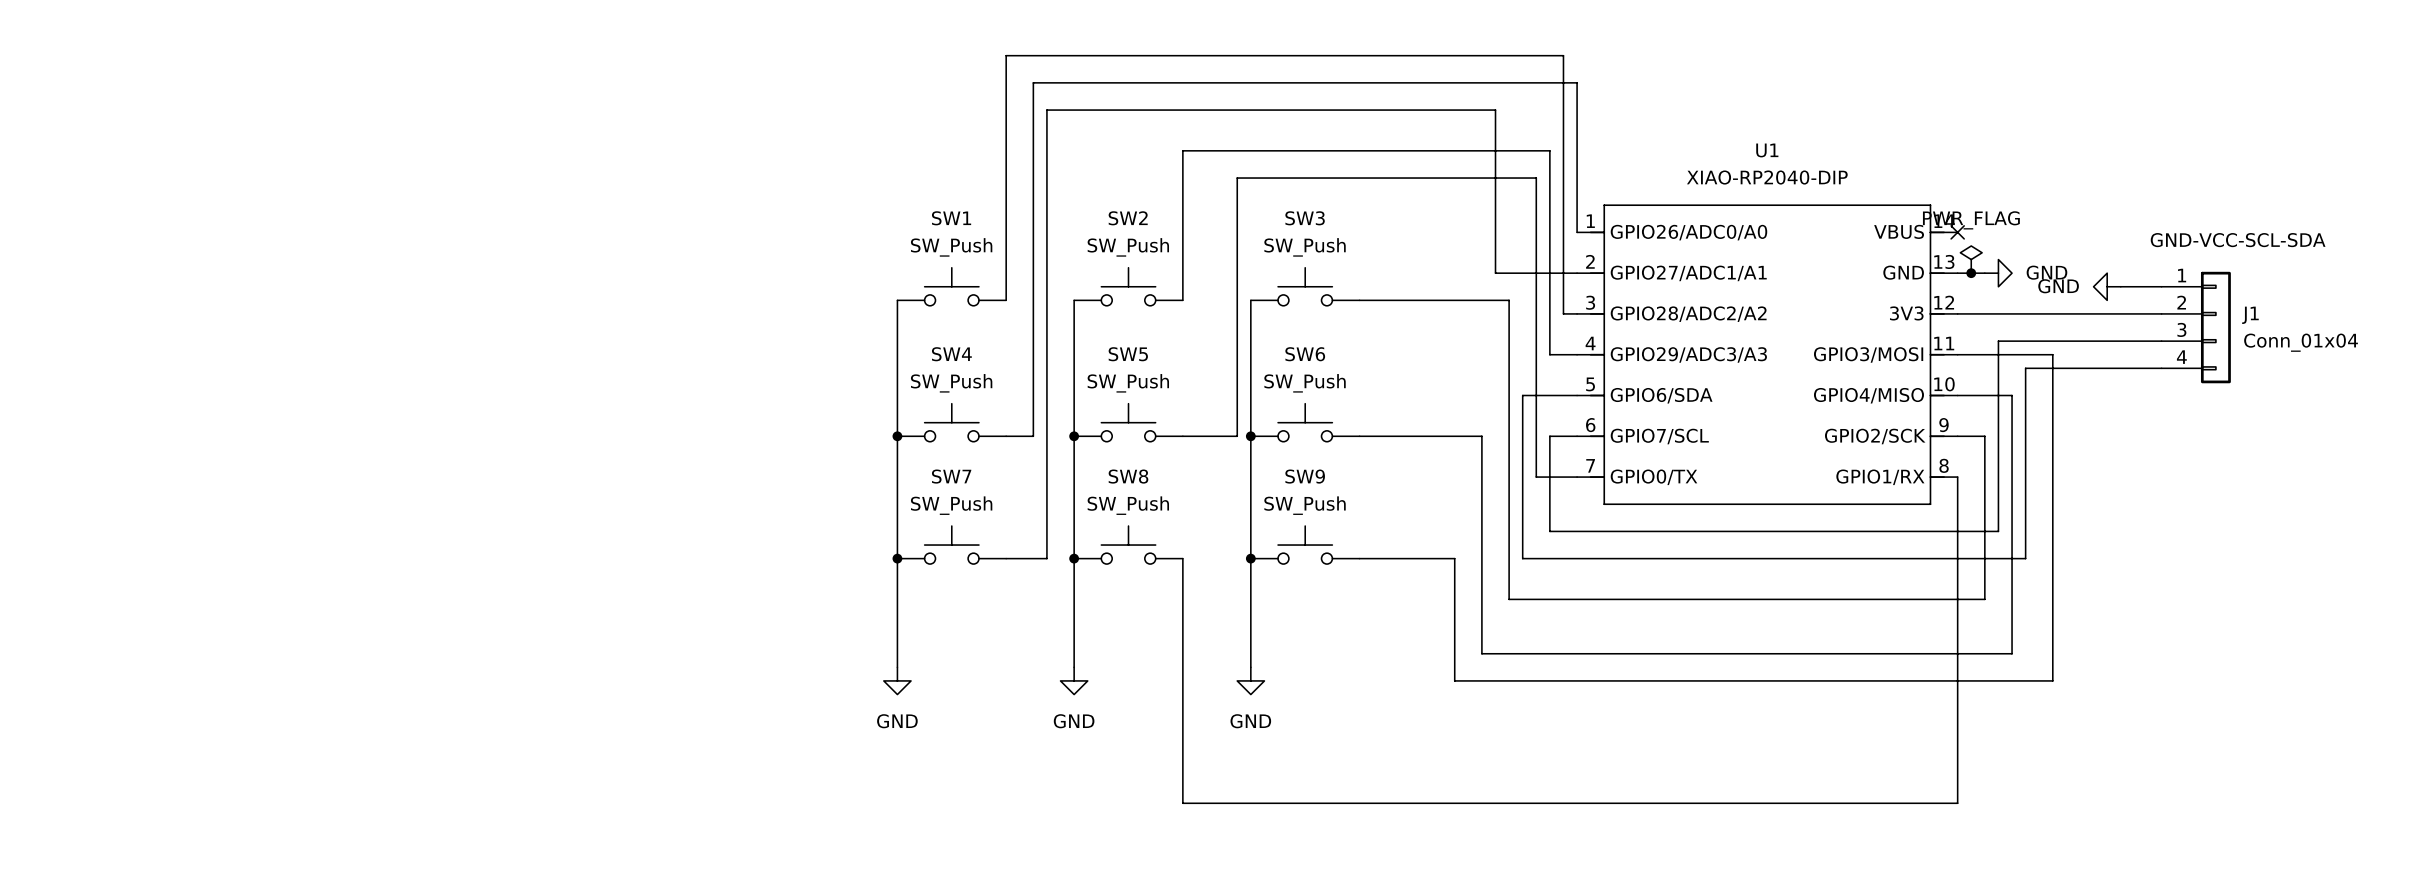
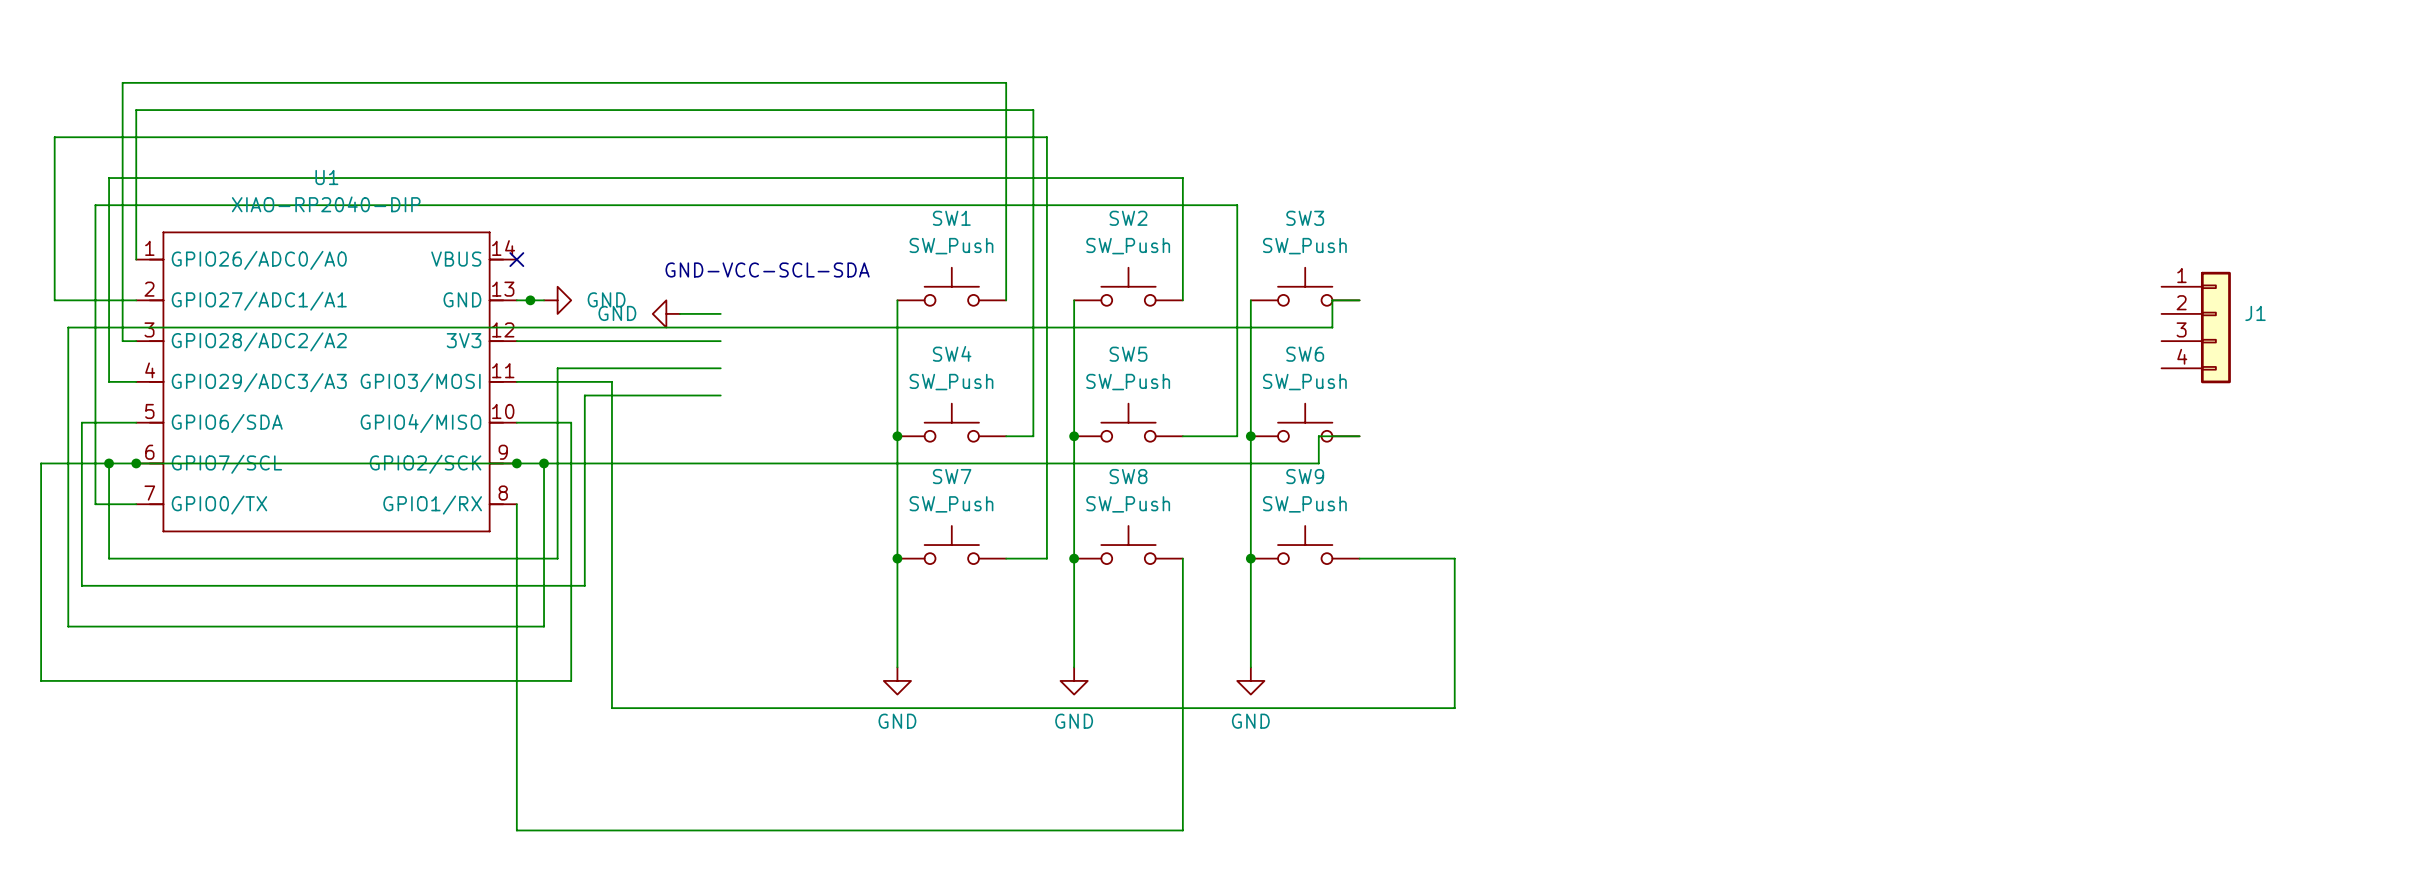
wire: (1006, 82) (1006, 55) (1563, 55) (1563, 313) (1577, 313) -> (1006, 82) (122, 82) (122, 341) (136, 341)
wire: (1033, 110) (1033, 82) (1577, 82) (1577, 232) -> (1033, 110) (136, 110) (136, 259)
wire: (1046, 137) (1046, 110) (1495, 110) (1495, 273) (1577, 273) -> (1046, 137) (54, 137) (54, 300) (136, 300)
wire: (1182, 178) (1182, 150) (1549, 150) (1549, 354) (1577, 354) -> (1182, 178) (109, 178) (109, 381) (136, 381)
wire: (1237, 205) (1237, 178) (1536, 178) (1536, 477) (1577, 477) -> (1237, 205) (95, 205) (95, 504) (136, 504)
no-connect mark: (1957, 232) -> none
text: GND-VCC-SCL-SDA (2238, 240) -> none
no-connect mark: none -> (516, 259)
power symbol: PWR_FLAG (1971, 259) -> none
text: none -> GND-VCC-SCL-SDA (767, 269)
wire: (1957, 273) (1984, 273) -> none
junction: (1971, 273) -> none
power symbol: GND (1998, 273) -> none
power symbol: GND (2107, 286) -> none
wire: (2120, 286) (2161, 286) -> none
wire: none -> (516, 300) (544, 300)
junction: none -> (530, 300)
power symbol: none -> GND (557, 300)
wire: (1359, 300) (1509, 300) (1509, 599) (1984, 599) (1984, 436) (1957, 436) -> (1359, 300) (1332, 300) (1332, 327) (68, 327) (68, 626) (544, 626) (544, 463)
power symbol: none -> GND (666, 313)
wire: none -> (679, 313) (720, 313)
wire: (1957, 313) (2161, 313) -> none
wire: none -> (516, 341) (720, 341)
wire: (2161, 341) (1998, 341) (1998, 531) (1549, 531) (1549, 436) (1577, 436) -> none
J1 value: Conn_01x04 (2301, 342) -> none
U1 position: (1767, 354) -> (326, 381)
wire: (1957, 354) (2052, 354) (2052, 680) (1454, 680) -> (516, 381) (611, 381) (611, 708) (1454, 708) (1454, 680)
wire: none -> (720, 368) (557, 368) (557, 558) (109, 558) (109, 463)
wire: (2161, 368) (2025, 368) (2025, 558) (1522, 558) (1522, 395) (1577, 395) -> none
wire: none -> (720, 395) (584, 395) (584, 585) (81, 585) (81, 422) (136, 422)
wire: (1957, 395) (2012, 395) (2012, 653) (1481, 653) (1481, 436) (1359, 436) -> (516, 422) (571, 422) (571, 680) (41, 680) (41, 463) (1318, 463) (1318, 436) (1359, 436)
junction: none -> (109, 463)
junction: none -> (136, 463)
junction: none -> (516, 463)
junction: none -> (544, 463)
wire: (1957, 477) (1957, 803) (1182, 803) -> (516, 504) (516, 830) (1182, 830) (1182, 803)

